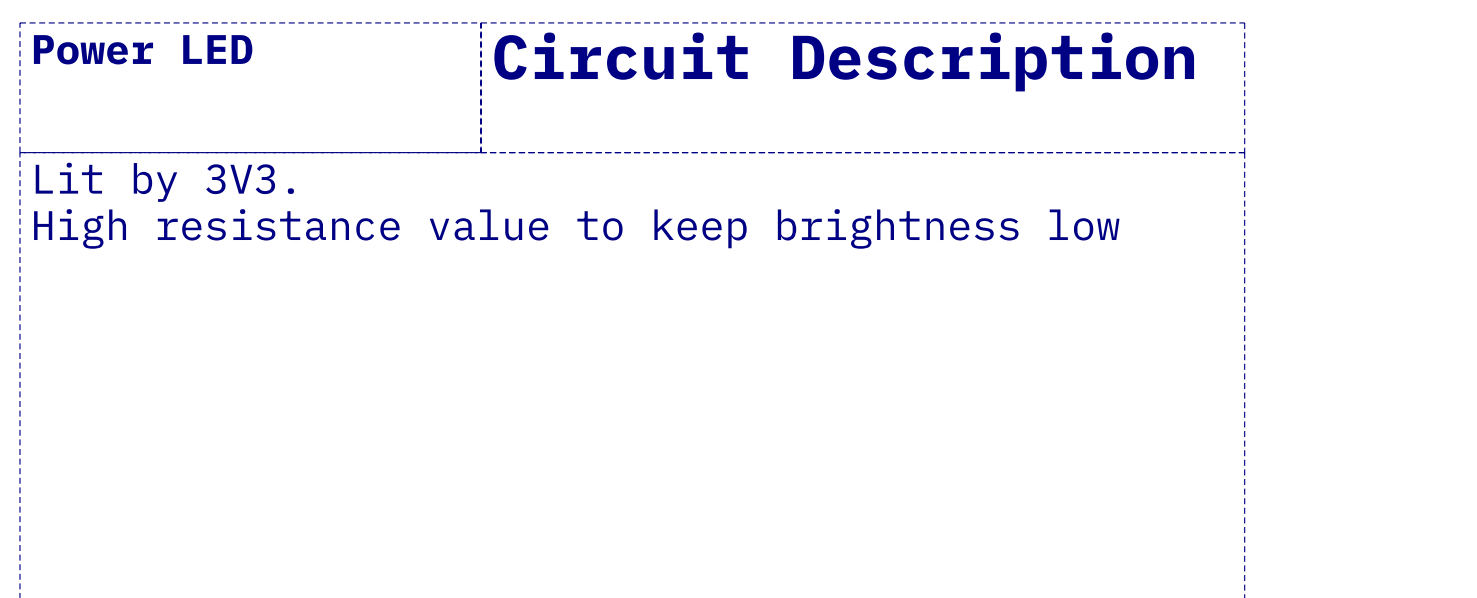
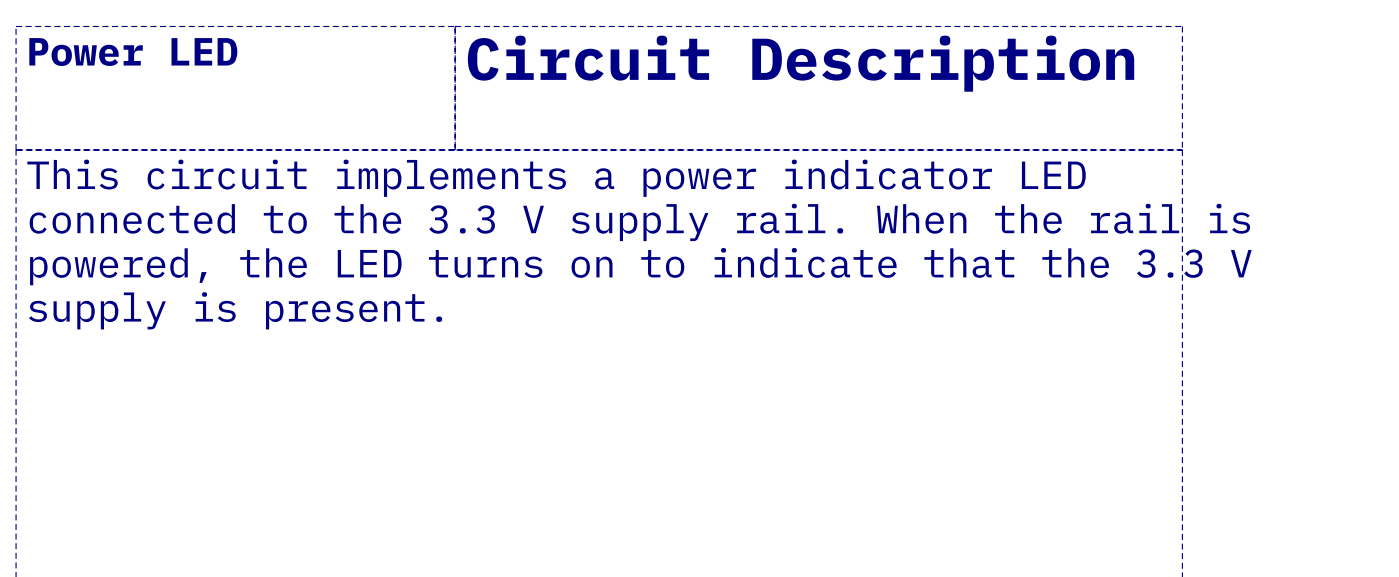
text: Lit by 3V3. (164, 182) -> This circuit implements a power indicator LED (556, 178)
text: High resistance value to keep brightness low (576, 228) -> connected to the 3.3 V supply rail. When the rail is (639, 222)
text: none -> powered, the LED turns on to indicate that the 3.3 V (640, 266)
text: none -> supply is present. (235, 310)

